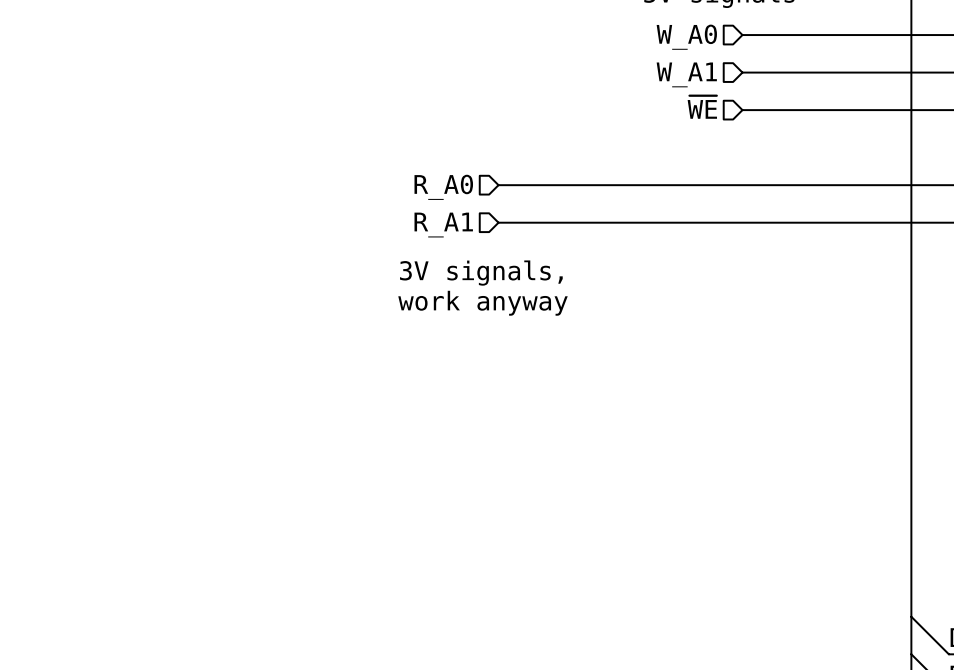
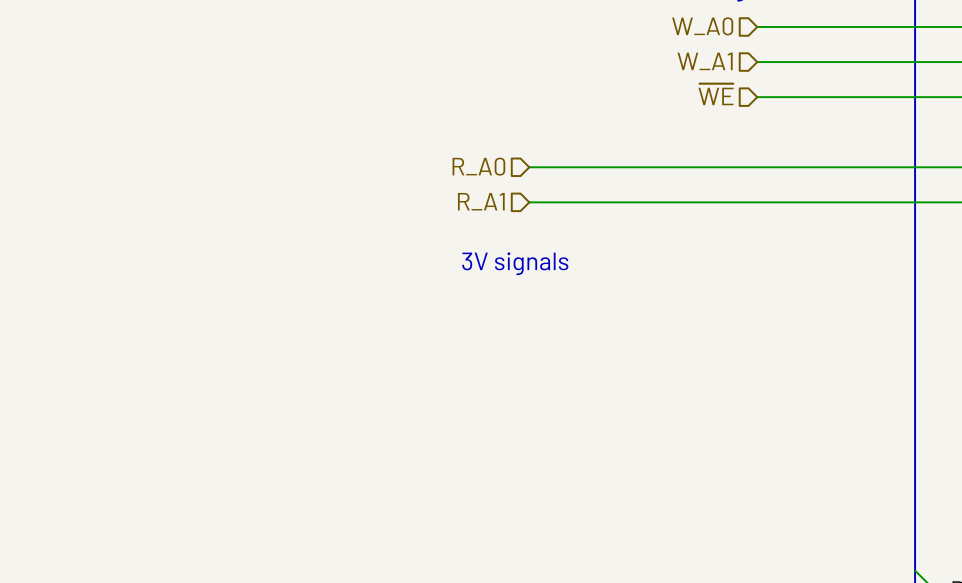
text: 3V signals, (481, 273) -> 3V signals (515, 263)
text: work anyway (483, 303) -> none

